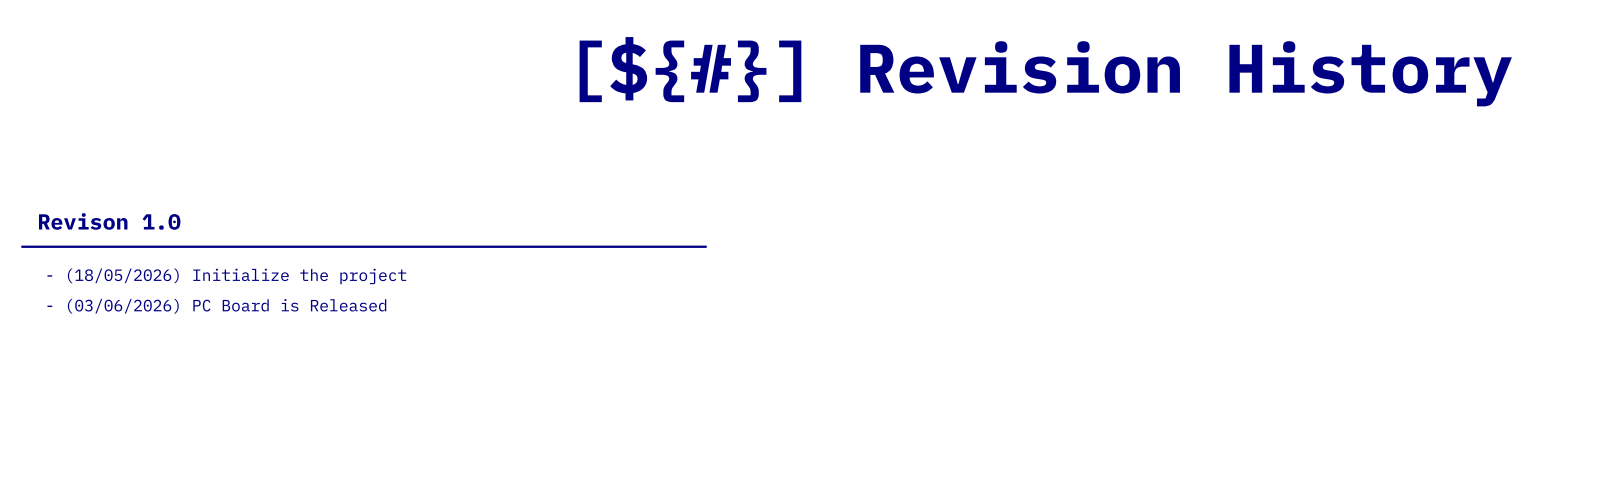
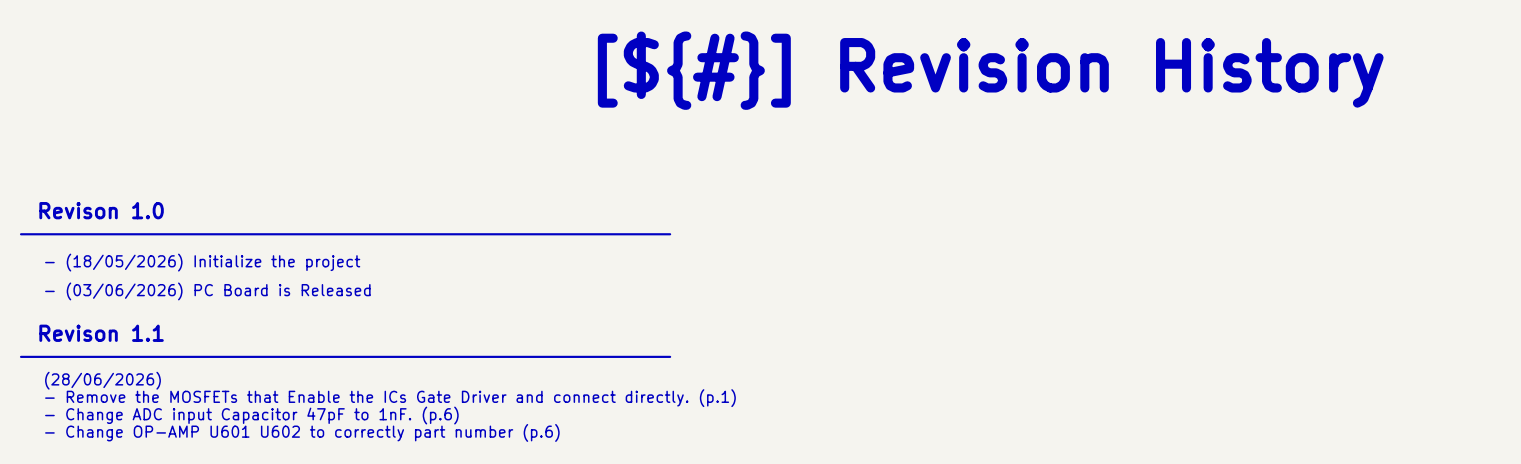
text: none -> Revison 1.1 (101, 333)
line: none -> (21, 356) (670, 356)
text: none -> (28/06/2026) (102, 380)
text: none -> - Remove the MOSFETs that Enable the ICs Gate Driver and connect directly. (p.1) (390, 398)
text: none -> - Change ADC input Capacitor 47pF to 1nF. (p.6) (251, 415)
text: none -> - Change OP-AMP U601 U602 to correctly part number (p.6) (302, 432)

